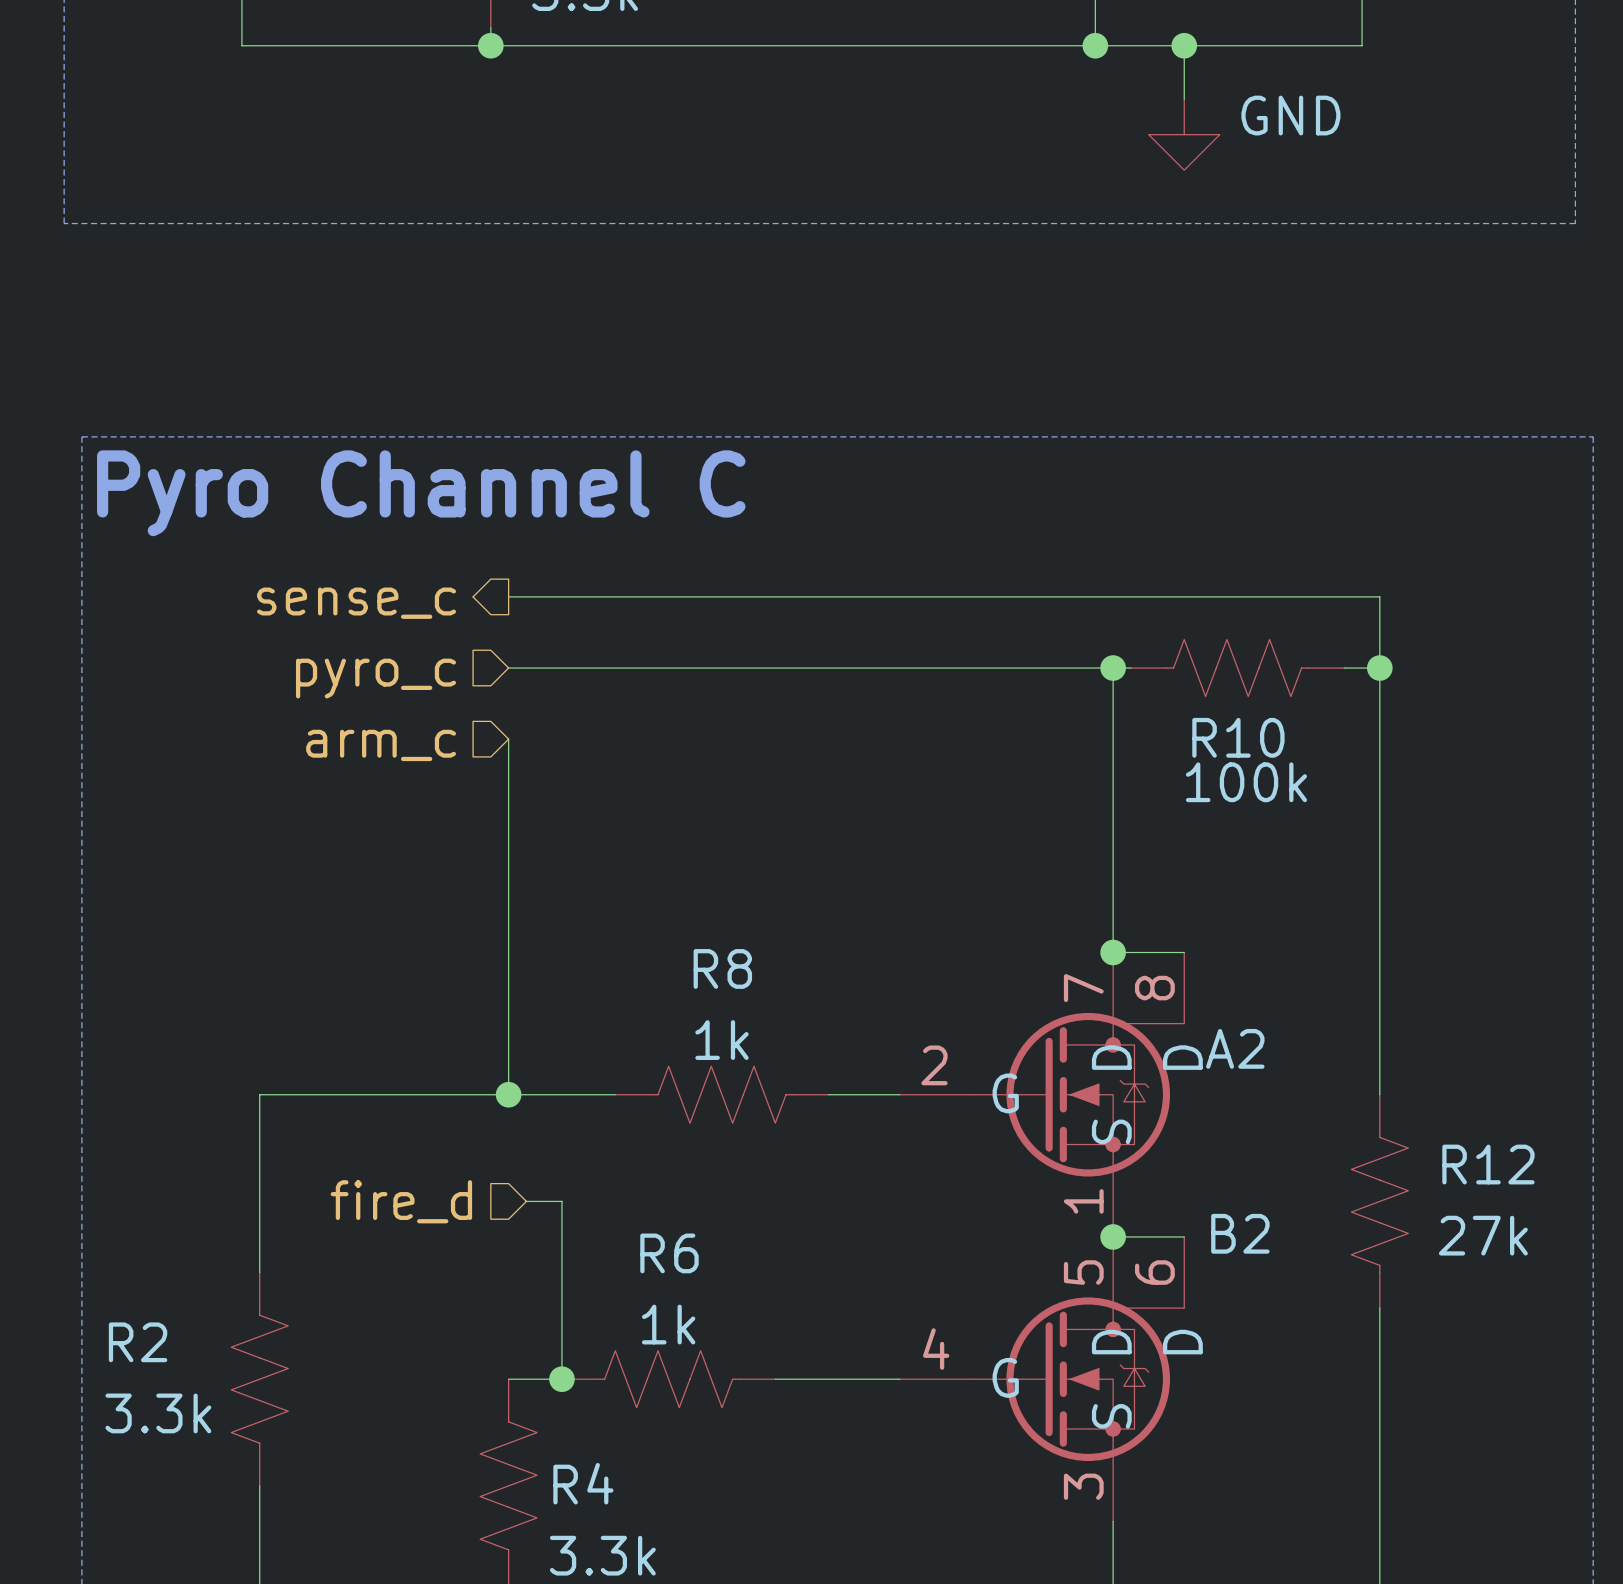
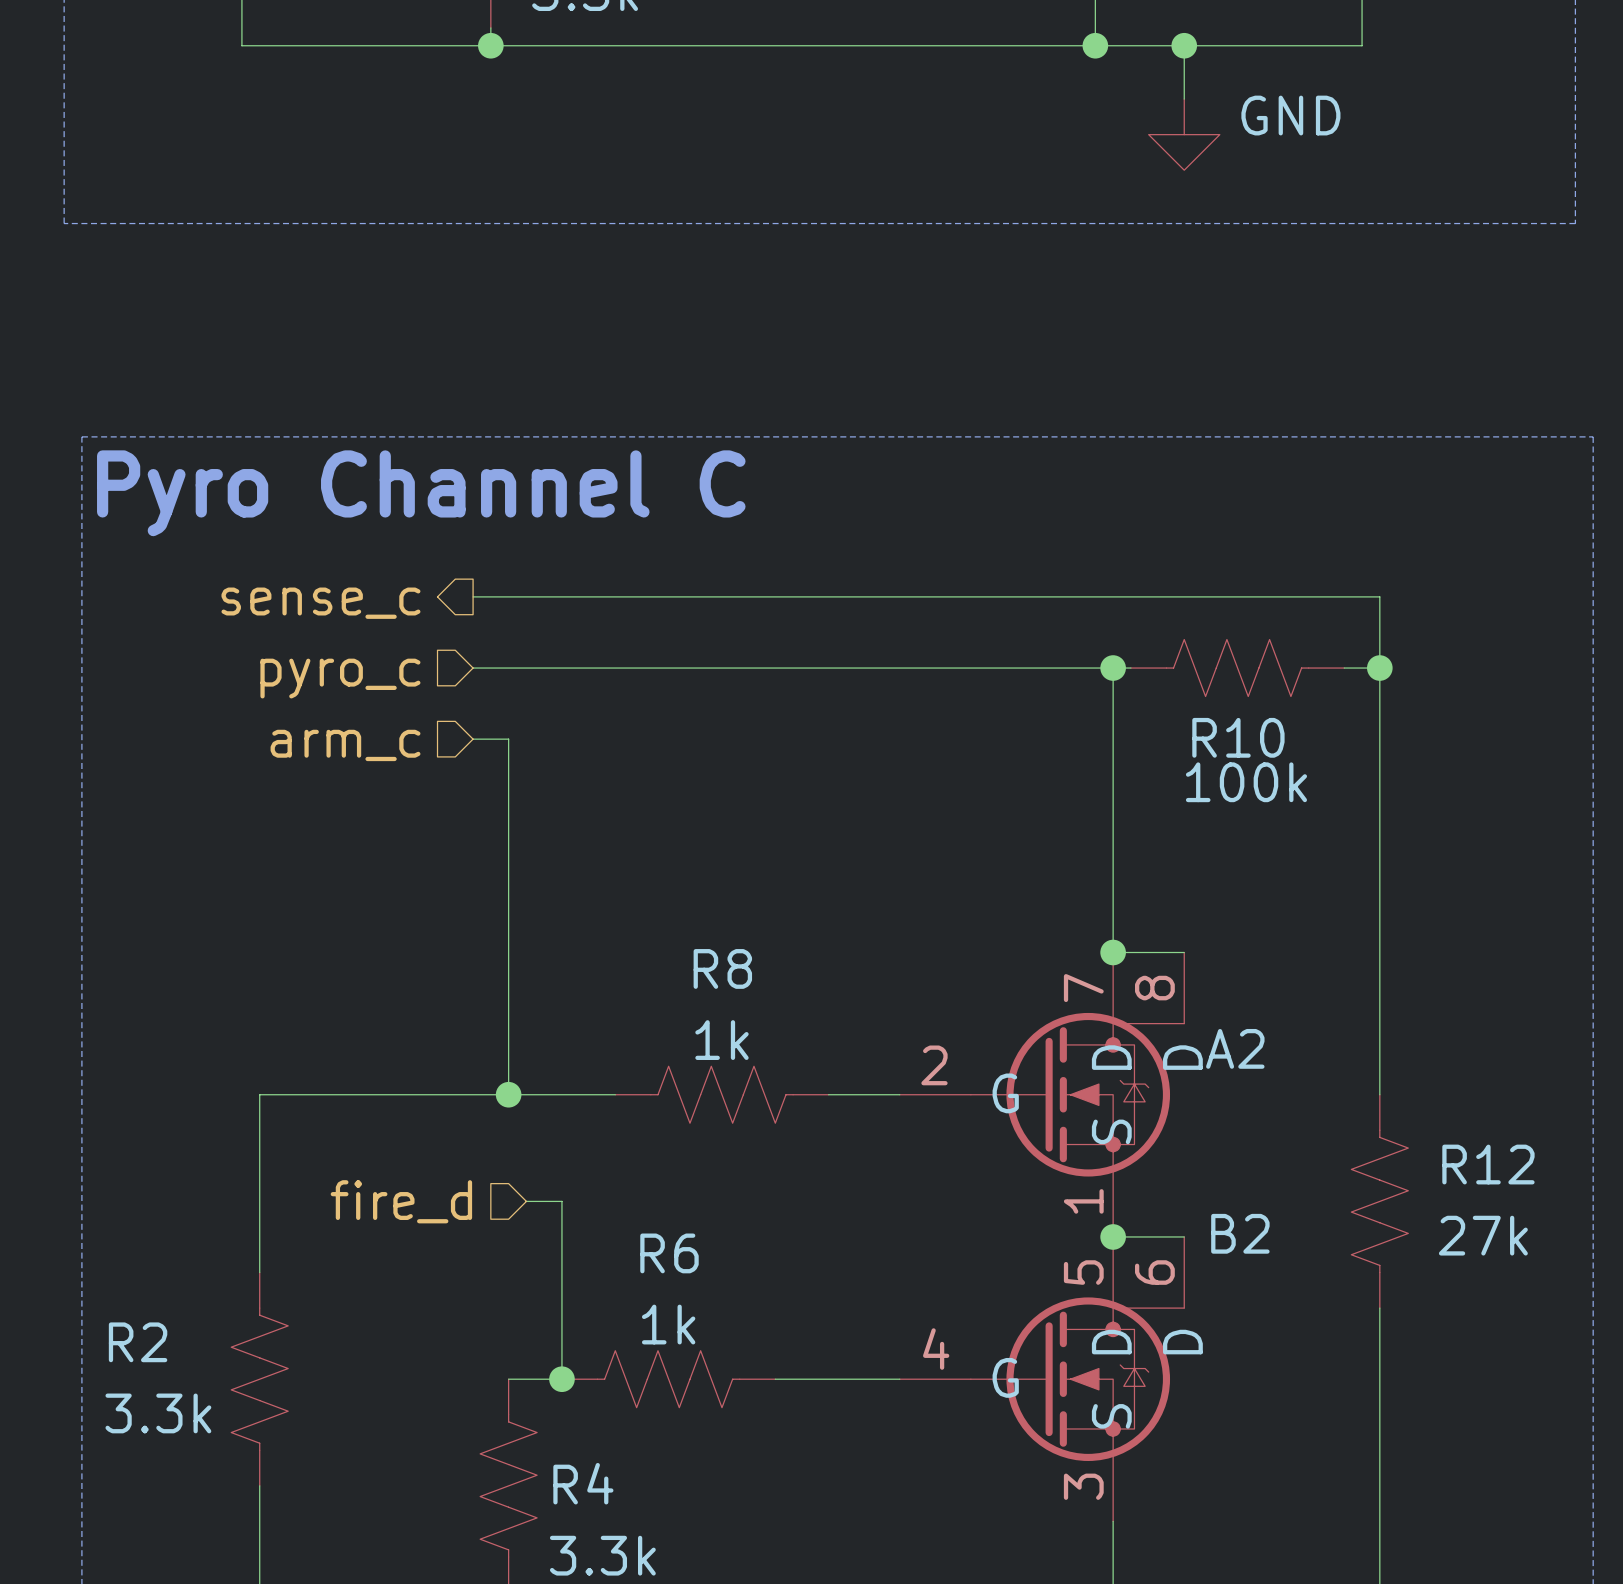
wire: none -> (473, 596) (508, 596)
hierarchical label position: sense_c (356, 603) -> sense_c (320, 603)
wire: none -> (473, 668) (508, 668)
hierarchical label position: pyro_c (375, 678) -> pyro_c (340, 678)
wire: none -> (473, 739) (508, 739)
hierarchical label position: arm_c (381, 745) -> arm_c (345, 745)

